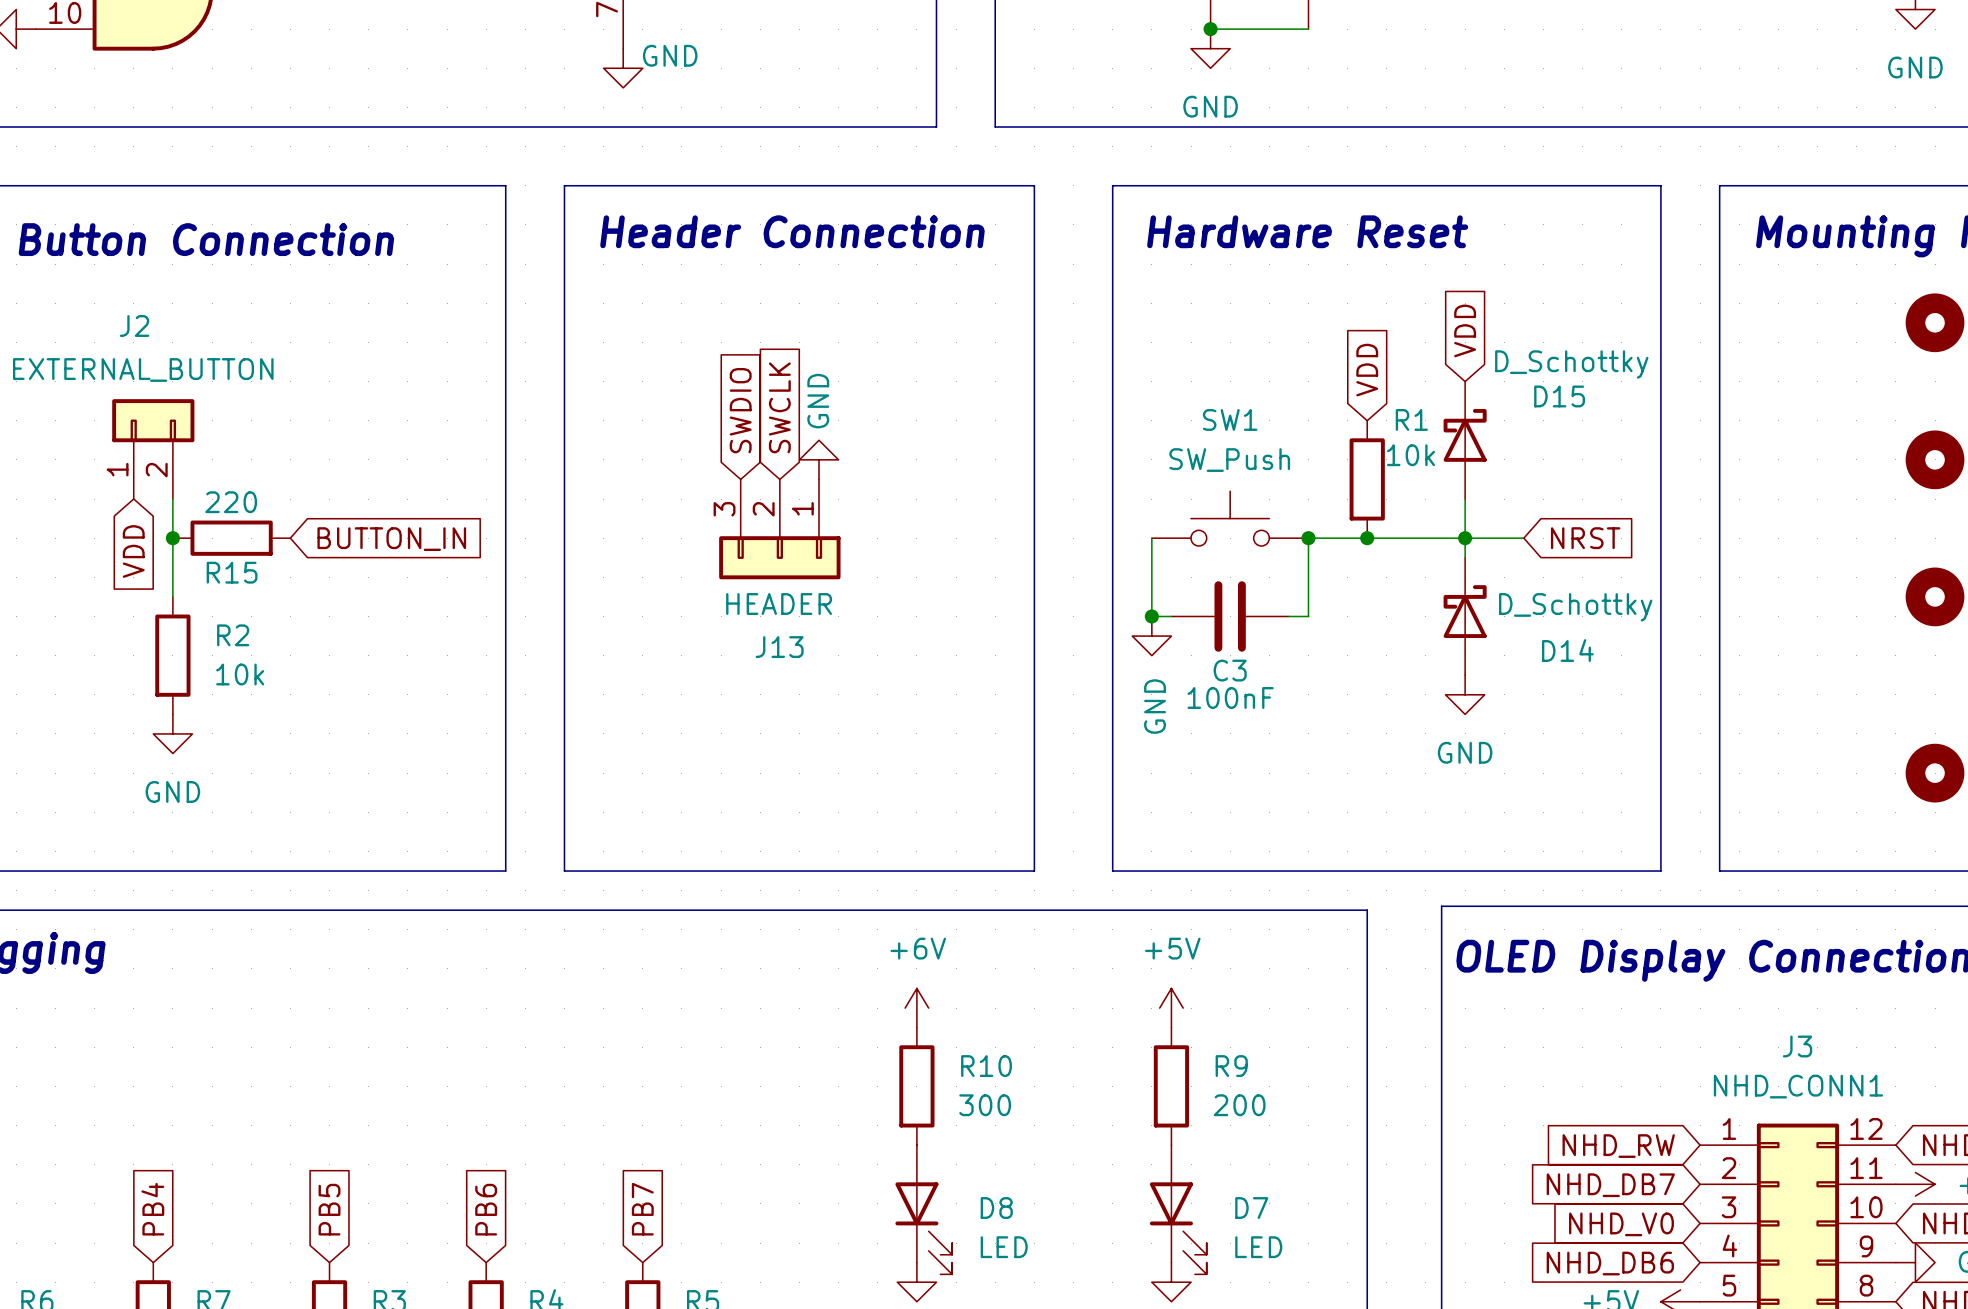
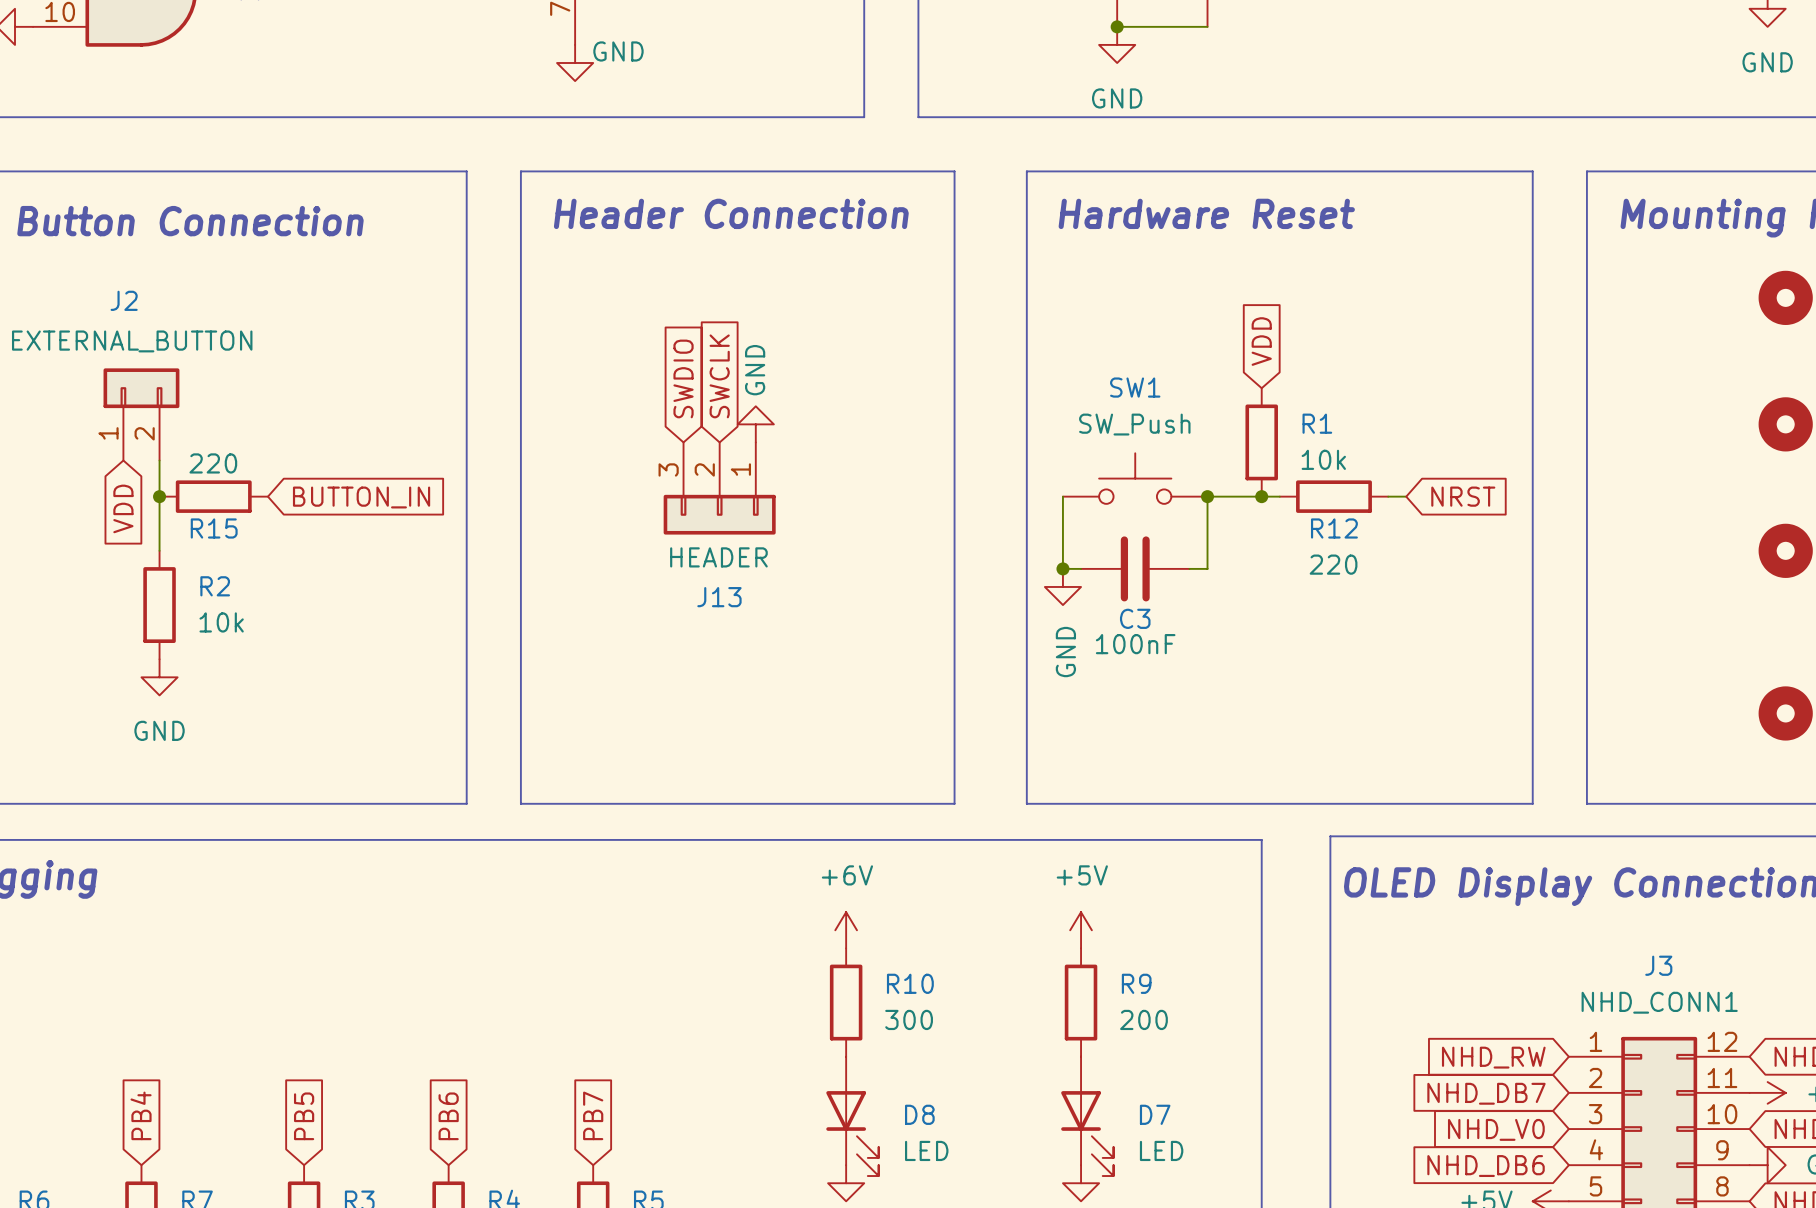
global label: VDD (1465, 330) -> none
R1 name position: R1 (1411, 419) -> R1 (1317, 423)
D15: D_Schottky (1465, 440) -> none
R1 value position: 10k (1411, 455) -> 10k (1323, 459)
wire: (1465, 499) (1465, 557) -> none
wire: (1386, 538) (1504, 538) -> none
R12: none -> 220 (1333, 496)
junction: (1465, 538) -> none
D14: D_Schottky (1465, 616) -> none
power symbol: GND (1465, 694) -> none

